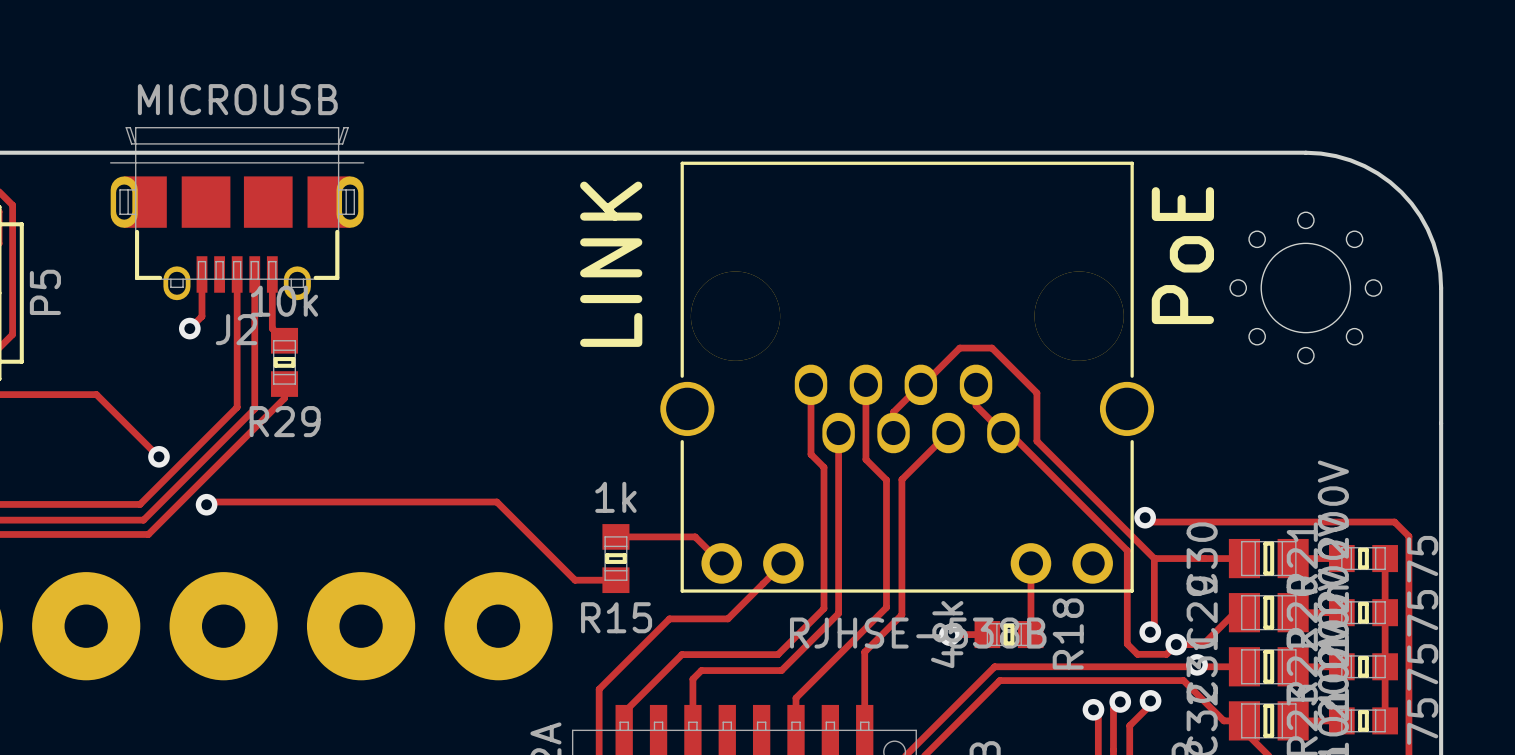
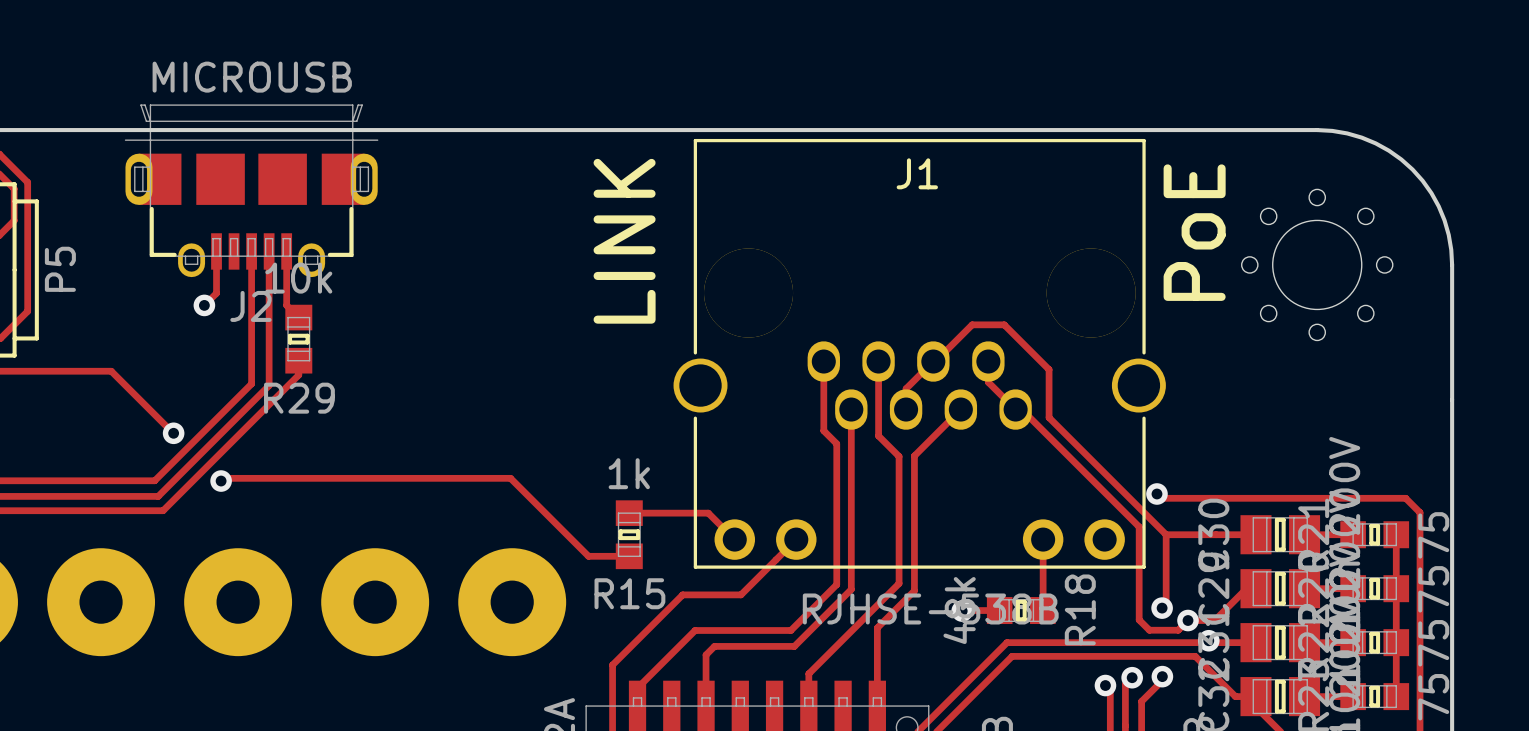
J1 name: none -> J1 (917, 173)

